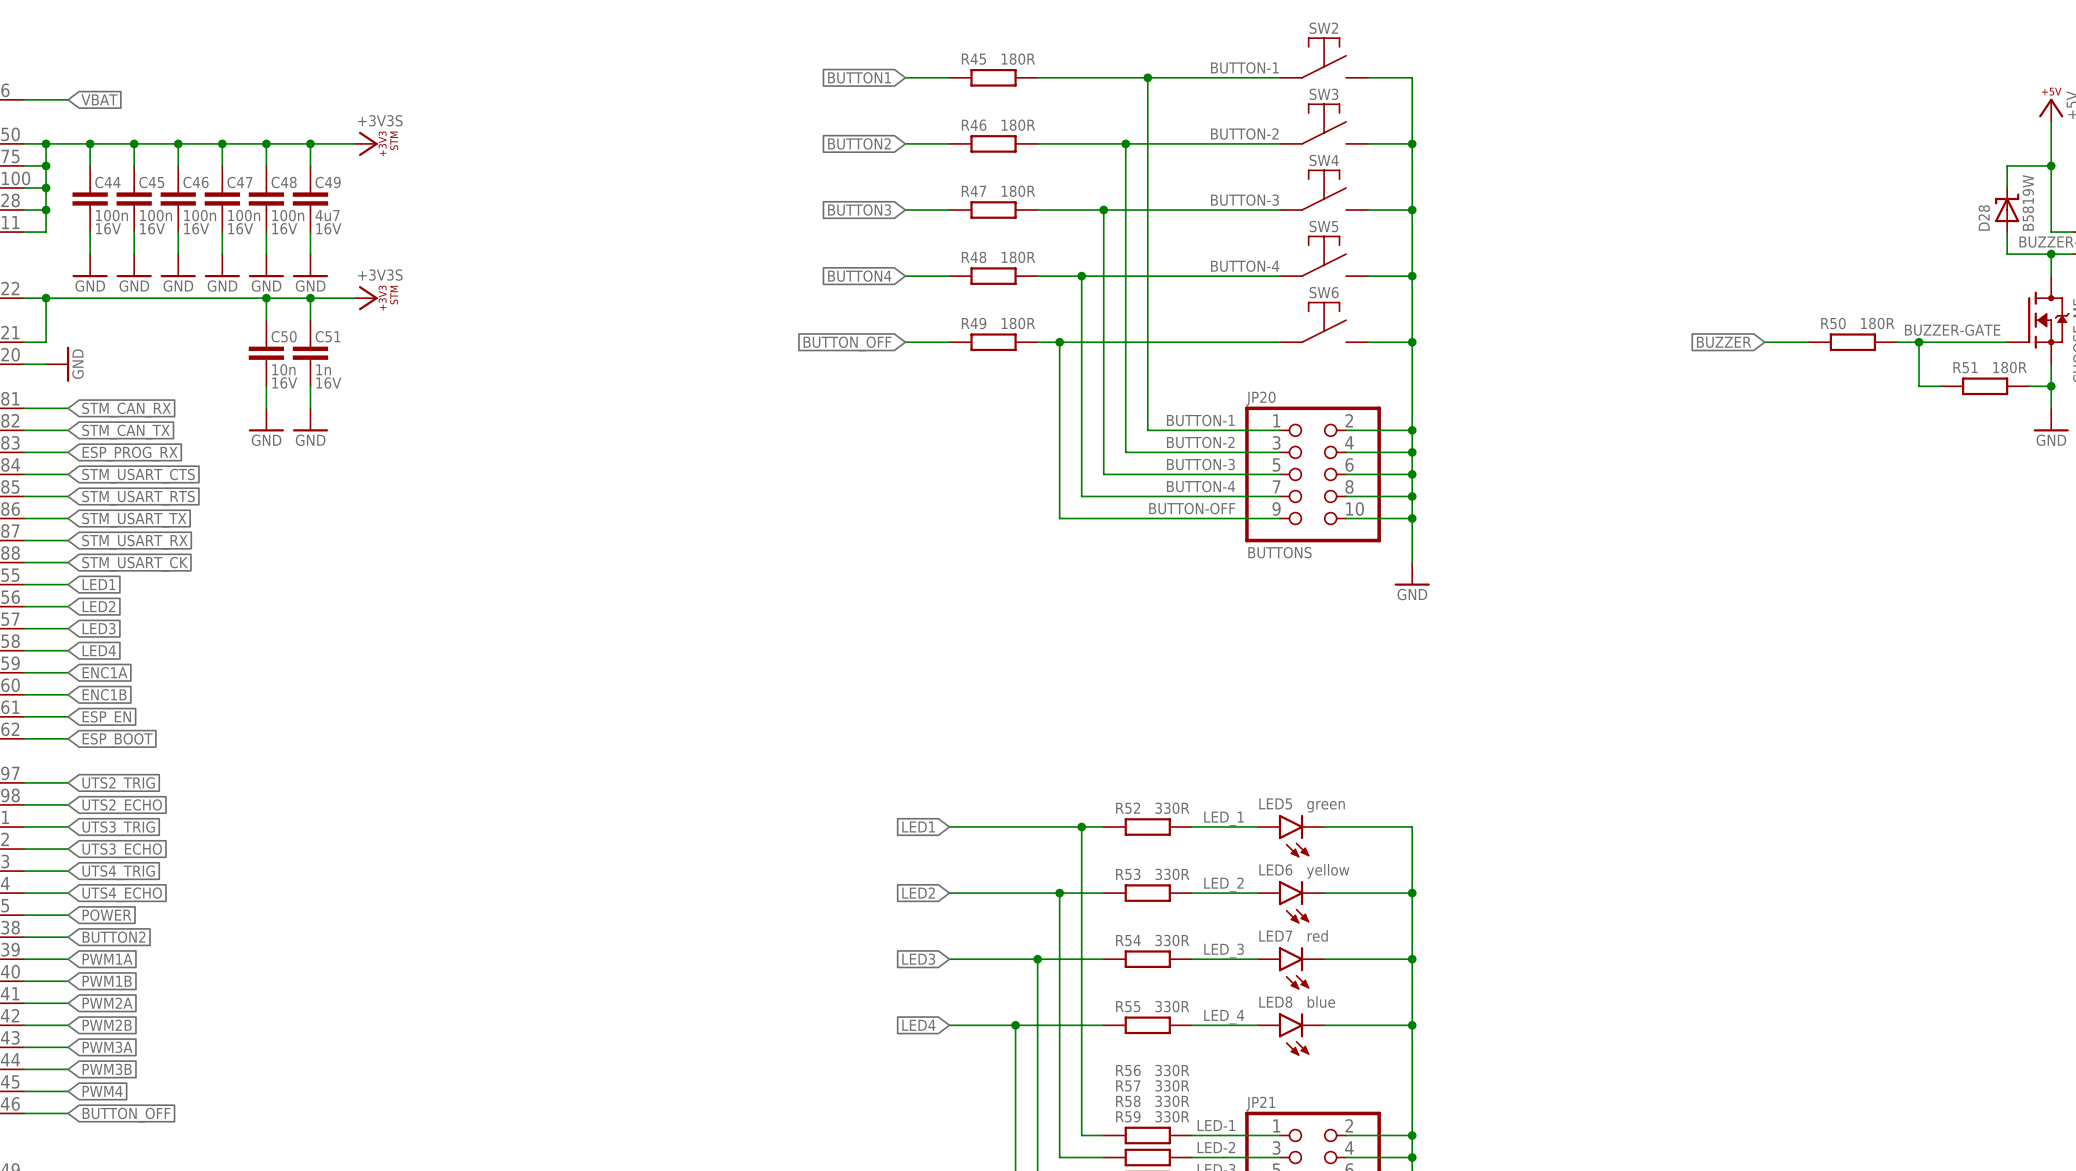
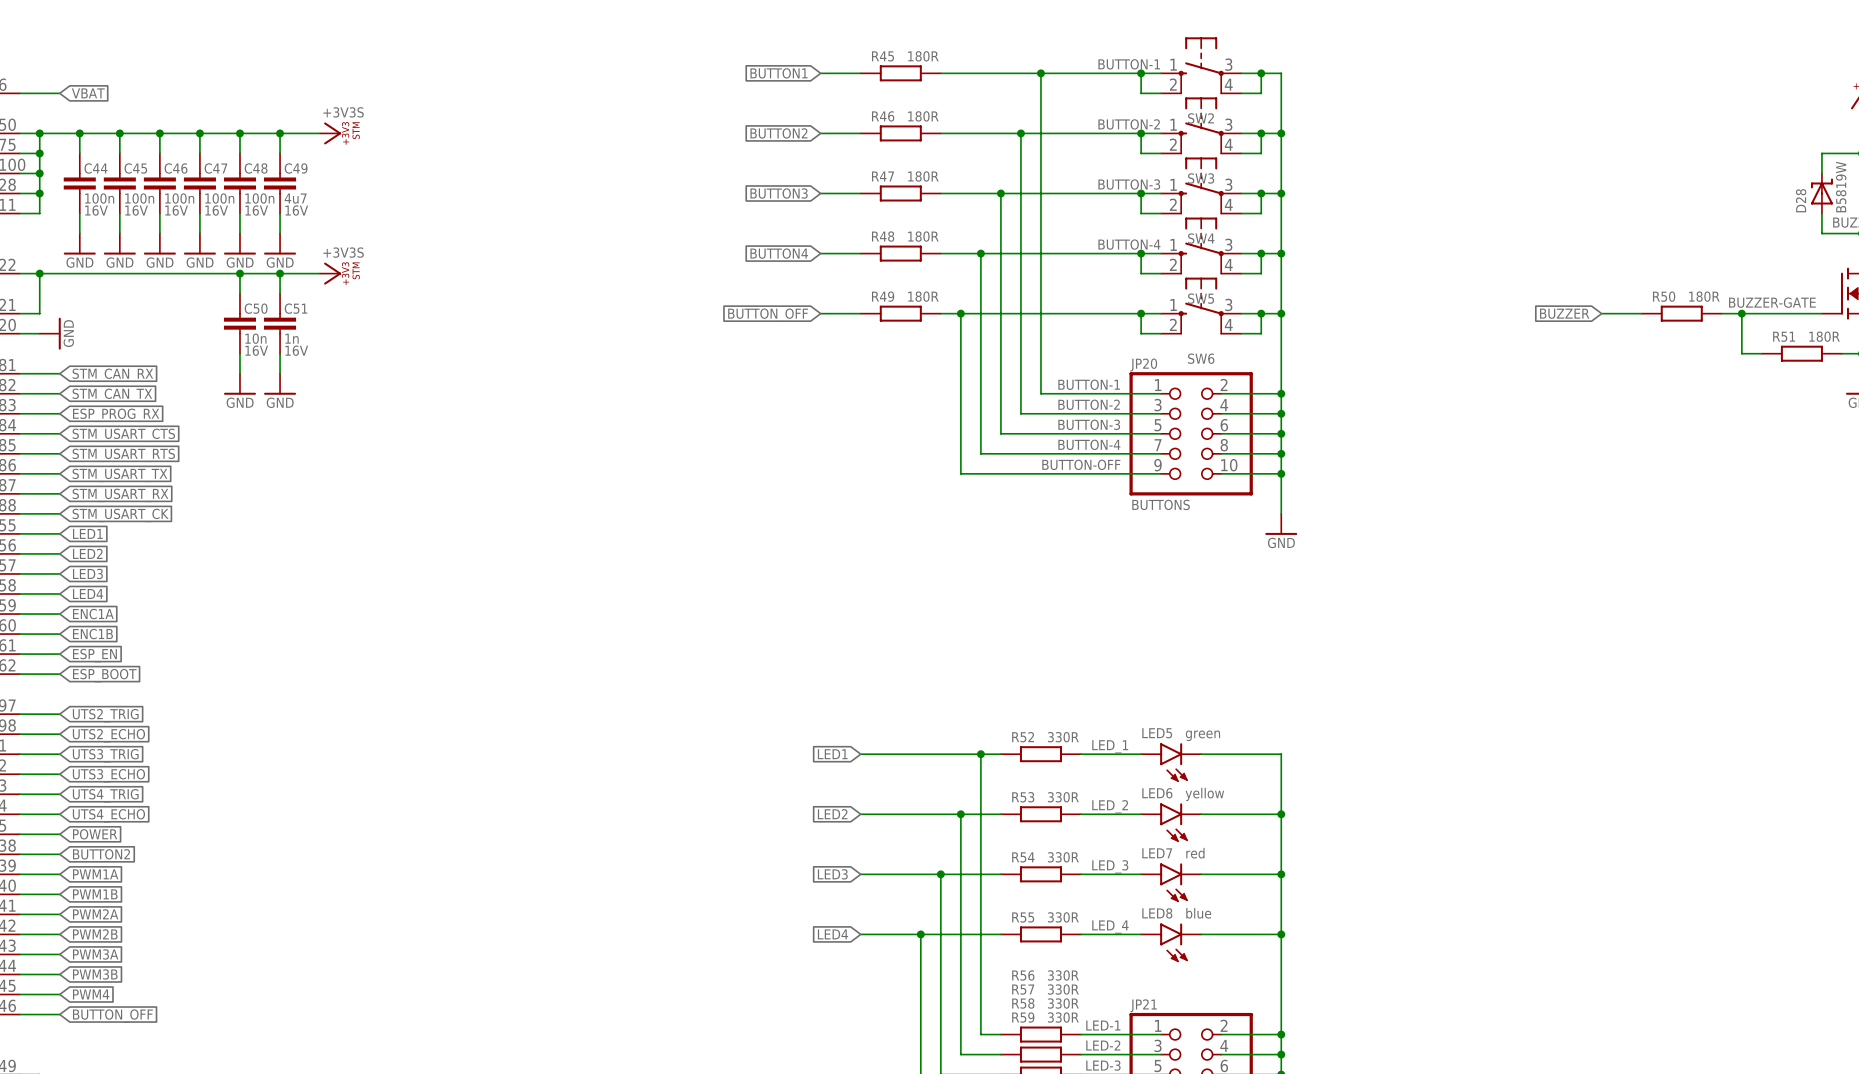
SW2 name position: SW2 (1323, 28) -> SW2 (1200, 118)
SW2 symbol: [1280, 37, 1369, 79] -> [1161, 37, 1242, 94]
wire: none -> (1141, 73) (1141, 93) (1161, 93)
junction: none -> (1141, 73)
wire: none -> (1261, 73) (1261, 93) (1241, 93)
junction: none -> (1261, 73)
SW3 name position: SW3 (1323, 94) -> SW3 (1201, 178)
SW3 symbol: [1280, 103, 1369, 145] -> [1161, 97, 1242, 155]
wire: none -> (1141, 133) (1141, 153) (1161, 153)
junction: none -> (1141, 133)
wire: none -> (1261, 133) (1261, 153) (1241, 153)
junction: none -> (1261, 133)
SW4 name position: SW4 (1324, 160) -> SW4 (1201, 238)
SW4 symbol: [1280, 169, 1369, 211] -> [1161, 157, 1242, 215]
wire: none -> (1141, 193) (1141, 213) (1161, 213)
junction: none -> (1141, 193)
wire: none -> (1261, 193) (1261, 213) (1241, 213)
junction: none -> (1261, 193)
SW5 name position: SW5 (1323, 226) -> SW5 (1201, 298)
SW5 symbol: [1280, 235, 1369, 277] -> [1161, 217, 1242, 275]
wire: none -> (1141, 253) (1141, 273) (1161, 273)
junction: none -> (1141, 253)
wire: none -> (1261, 253) (1261, 273) (1241, 273)
junction: none -> (1261, 253)
SW6 name position: SW6 (1324, 292) -> SW6 (1201, 358)
SW6 symbol: [1280, 301, 1369, 343] -> [1161, 277, 1242, 335]
wire: none -> (1141, 313) (1141, 333) (1161, 333)
junction: none -> (1141, 313)
wire: none -> (1261, 313) (1261, 333) (1241, 333)
junction: none -> (1261, 313)

